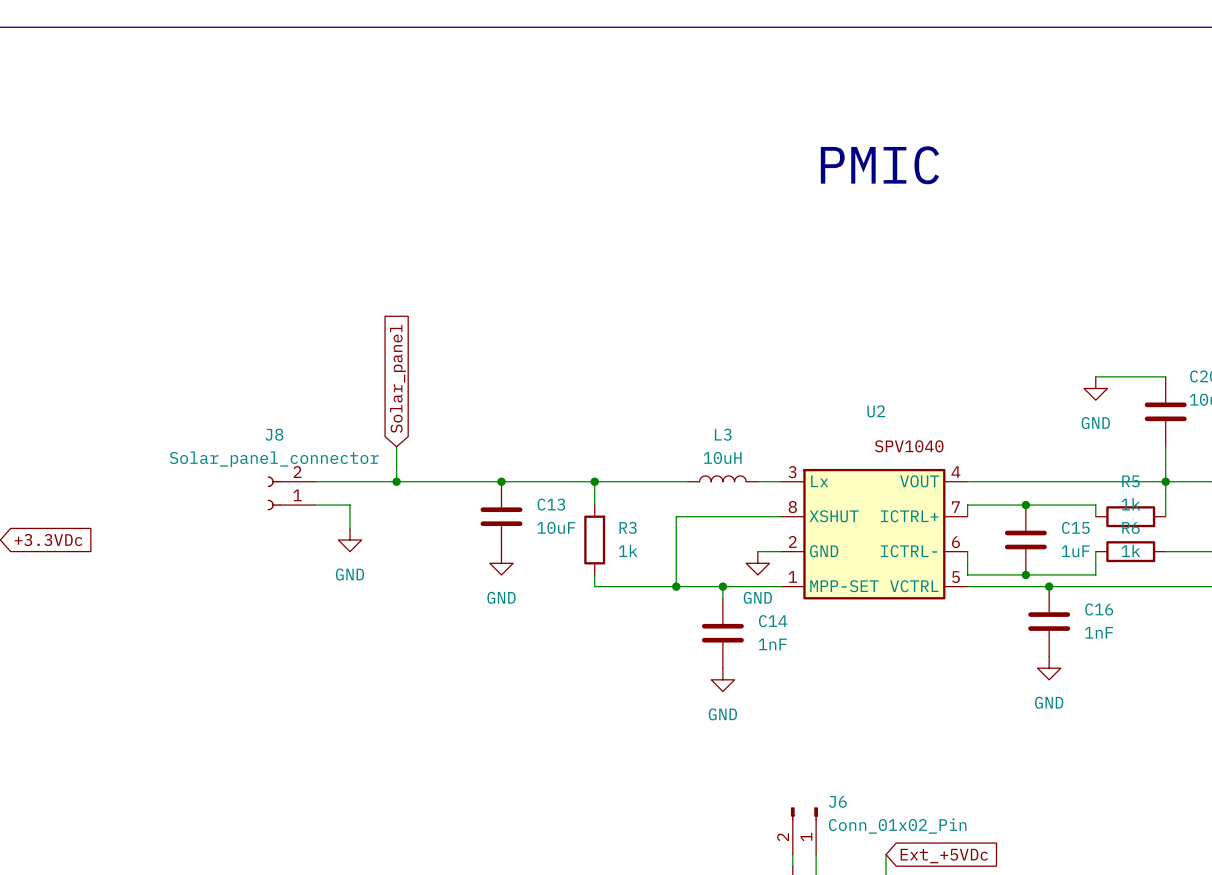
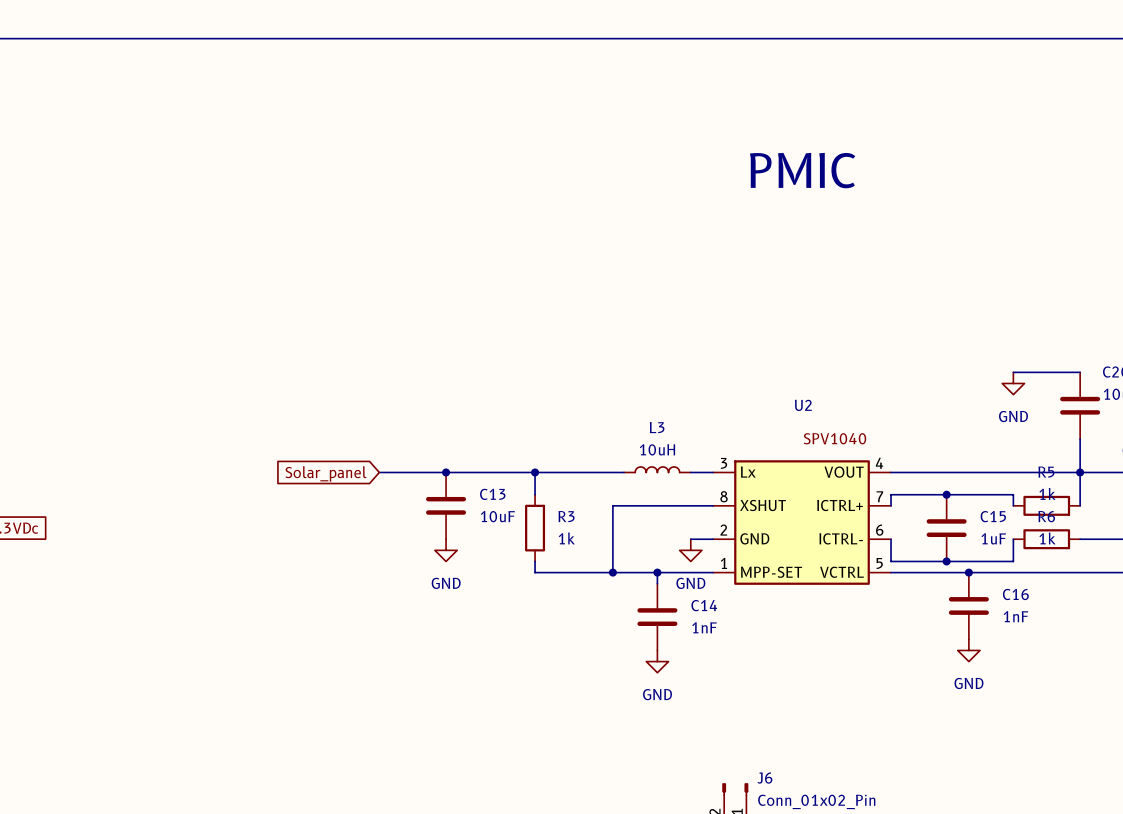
global label rotation: 0° (397, 378) -> 90° counterclockwise (326, 473)
wire: (396, 446) (396, 481) -> none
wire: (315, 481) (431, 481) -> none
junction: (396, 481) -> none
J8: Solar_panel_connector (291, 493) -> none
wire: (315, 505) (350, 505) (350, 528) -> none
power symbol: GND (350, 540) -> none

